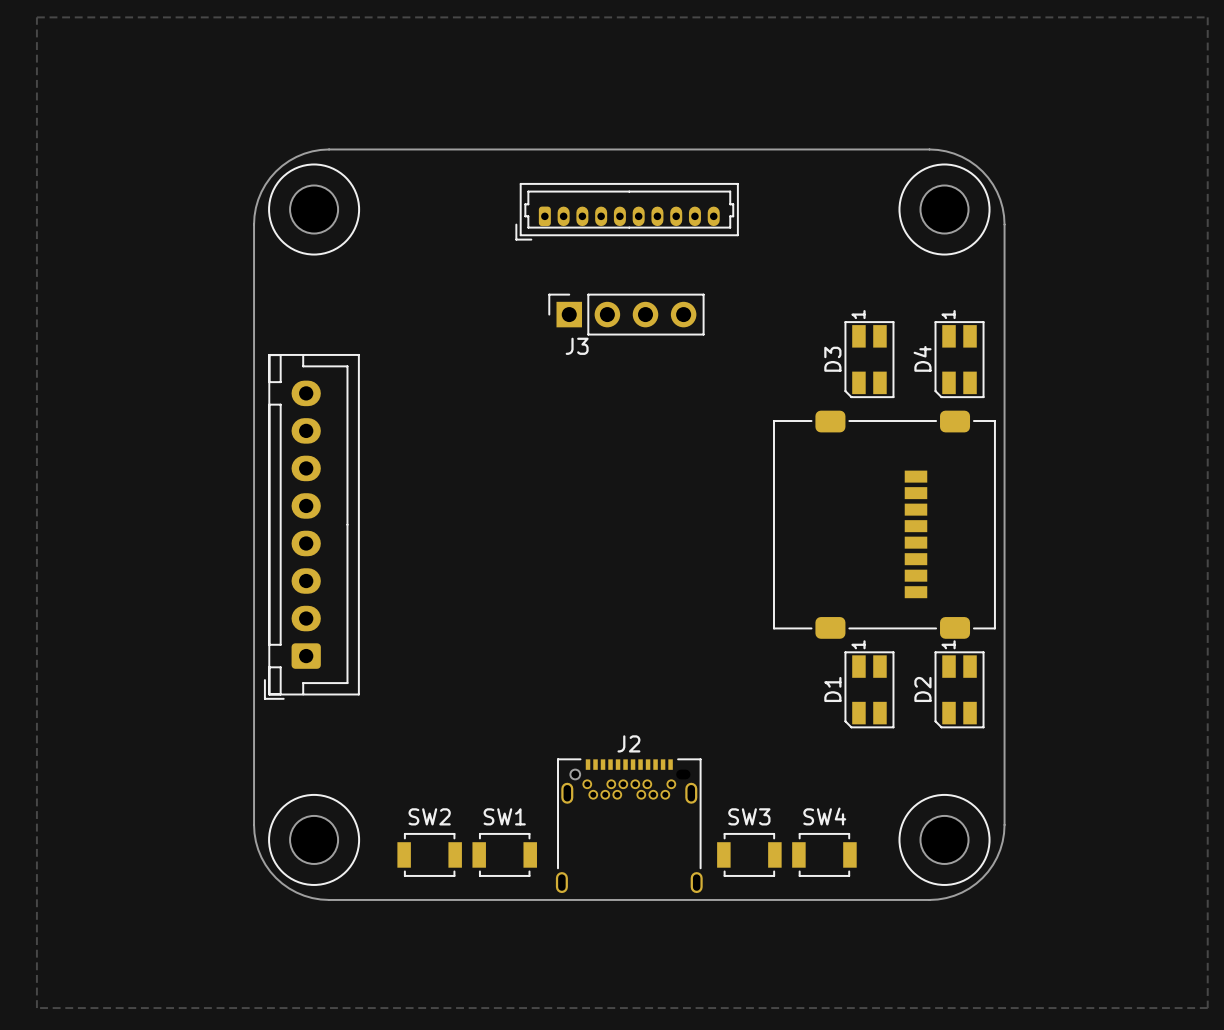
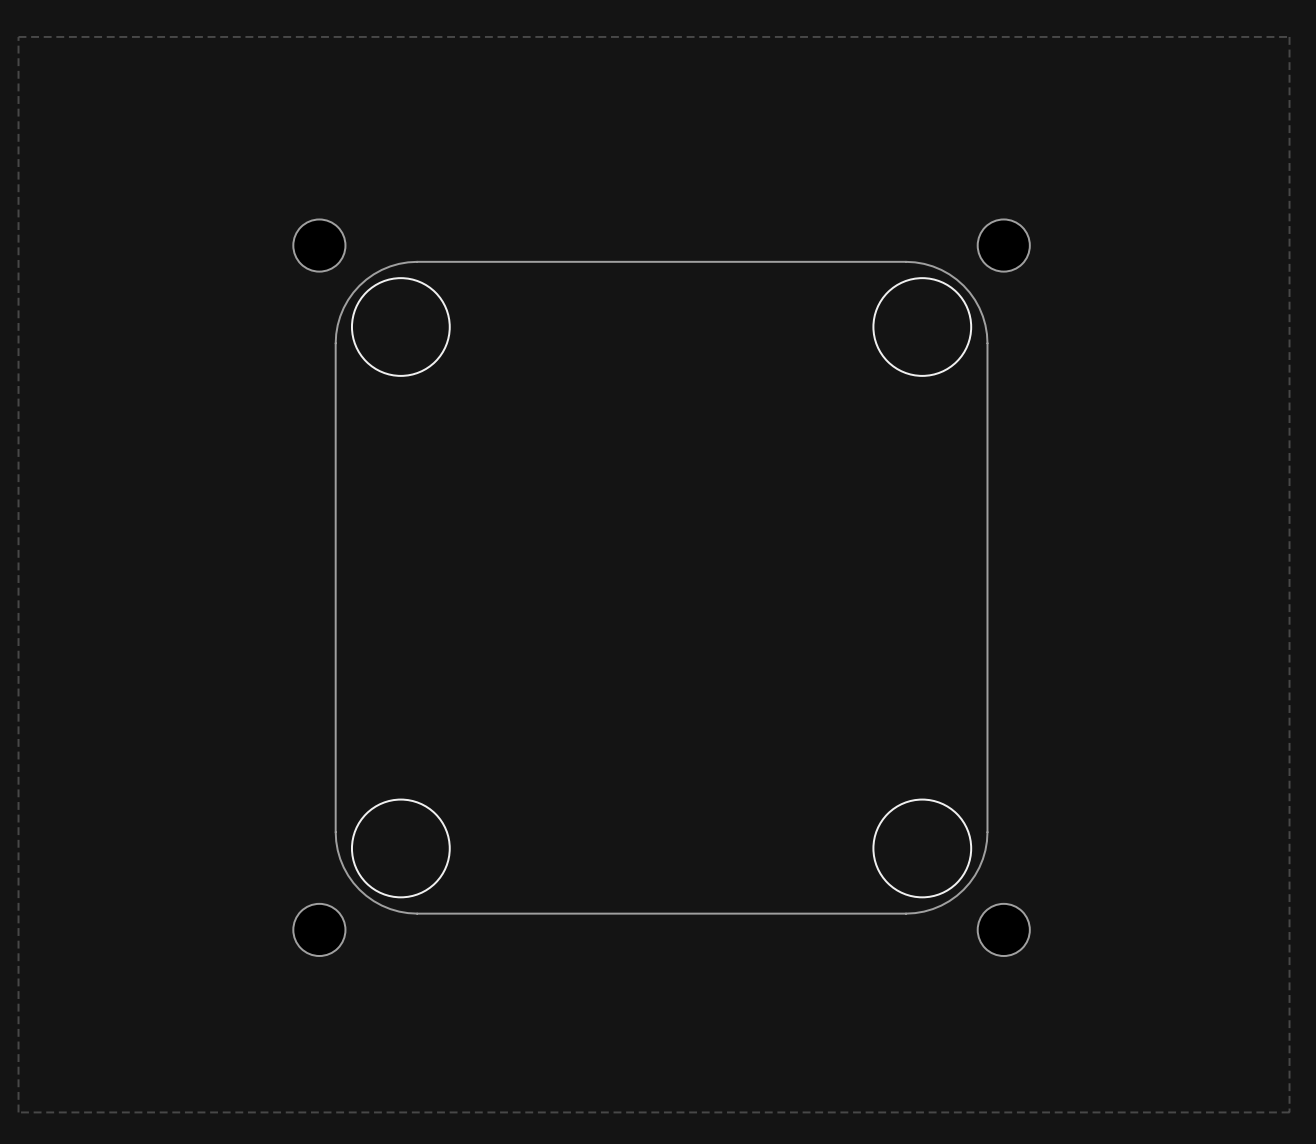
board edge: (329, 149) (929, 149) (946, 151) (962, 156) (976, 165) (988, 177) (1000, 199) (1004, 224) (1004, 824) (1002, 841) (997, 857) (988, 871) (976, 883) (954, 895) (929, 899) (329, 899) (312, 898) (296, 892) (282, 883) (270, 871) (258, 849) (254, 824) (254, 216) (261, 191) (276, 171) (296, 156) (312, 151) (329, 149) -> (417, 261) (390, 266) (366, 279) (348, 299) (340, 316) (336, 334) (335, 832) (340, 859) (353, 882) (366, 895) (381, 905) (399, 911) (417, 913) (906, 913) (932, 909) (956, 895) (969, 882) (979, 867) (985, 850) (987, 832) (987, 343) (982, 316) (969, 292) (956, 279) (941, 269) (924, 263) (906, 261) (417, 261)
drawing position: (314, 209) -> (400, 327)
drawing position: (944, 209) -> (922, 327)
part: (627, 211) -> none
J3: (626, 314) -> none
D3: (869, 359) -> none
D4: (959, 359) -> none
part: (884, 524) -> none
part: (311, 526) -> none
D1: (869, 689) -> none
D2: (959, 689) -> none
J2: (629, 825) -> none
drawing position: (314, 839) -> (400, 848)
drawing position: (944, 839) -> (922, 848)
SW2: (429, 854) -> none
SW1: (504, 854) -> none
SW3: (749, 854) -> none
SW4: (824, 854) -> none

